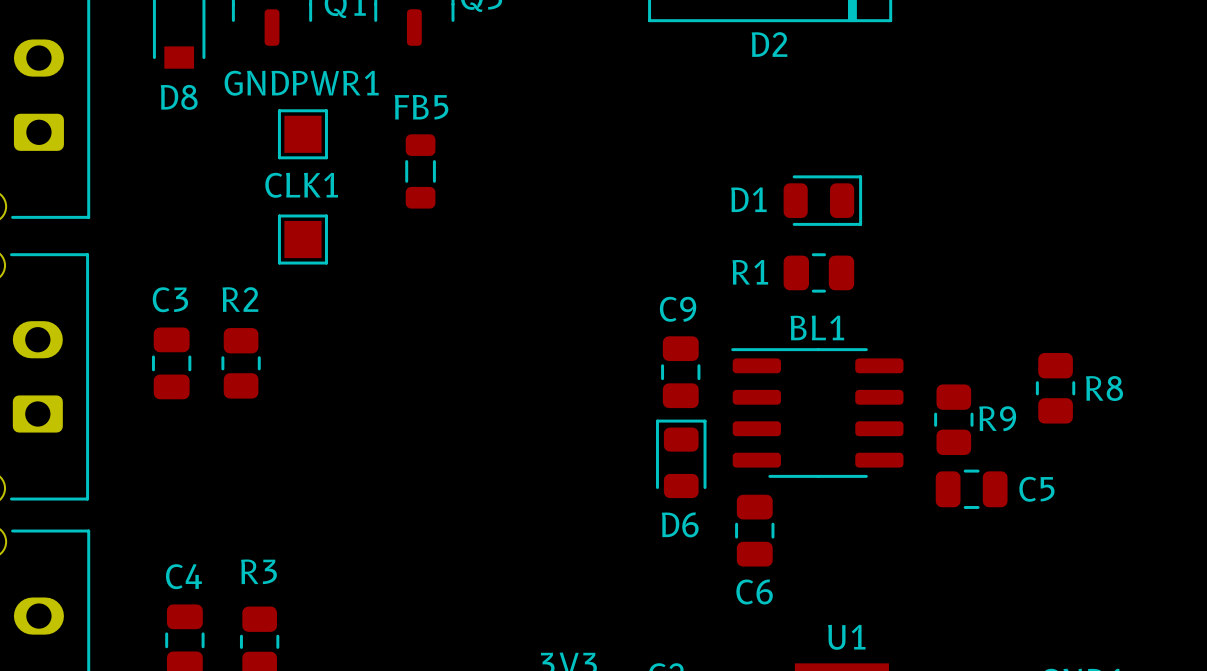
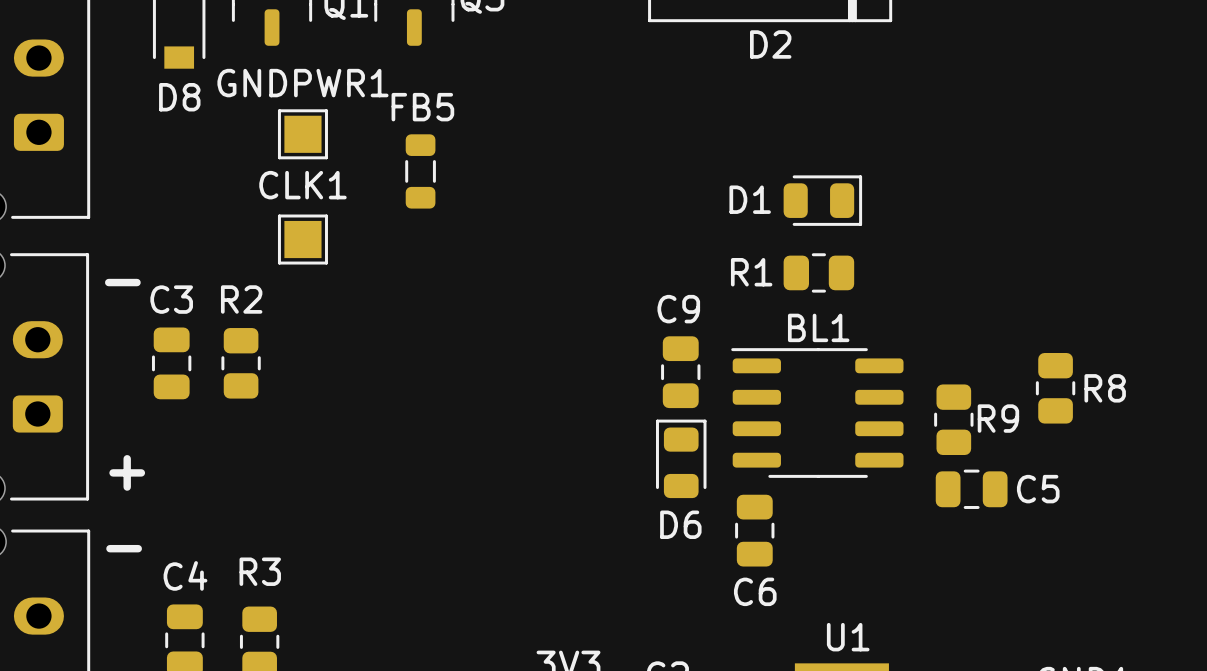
text: none -> _ (122, 282)
text: none -> + (127, 472)
text: none -> _ (124, 548)

